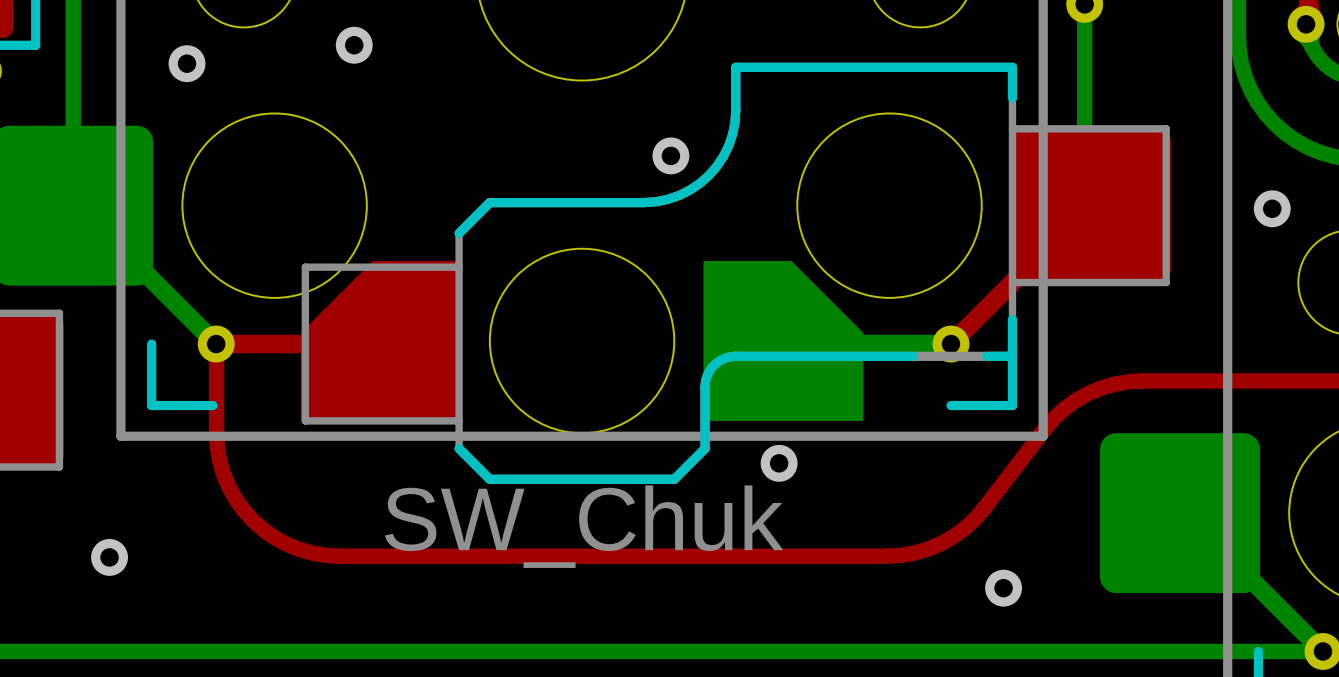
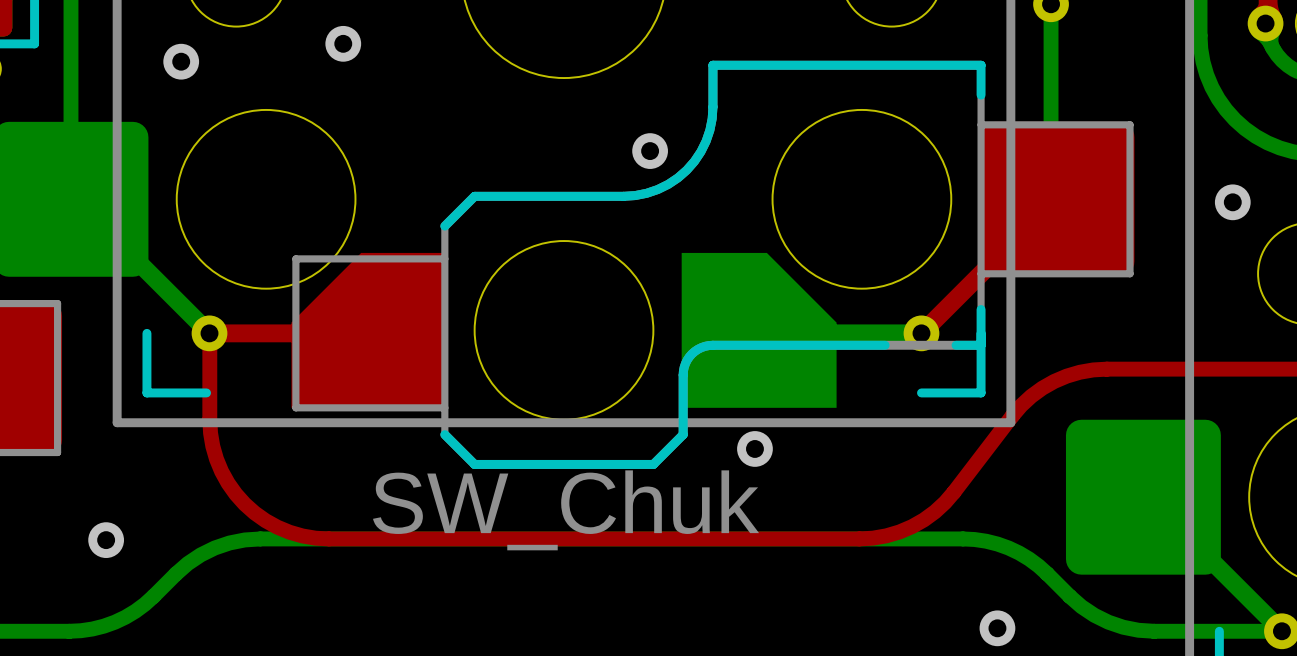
via position: (1003, 588) -> (997, 628)
bottom track: (71, 651) (1191, 651) -> (69, 631) (92, 628) (125, 617) (144, 604) (176, 573) (200, 554) (229, 543) (260, 538) (974, 539) (997, 544) (1029, 559) (1081, 606) (1094, 615) (1123, 627) (1154, 631)

